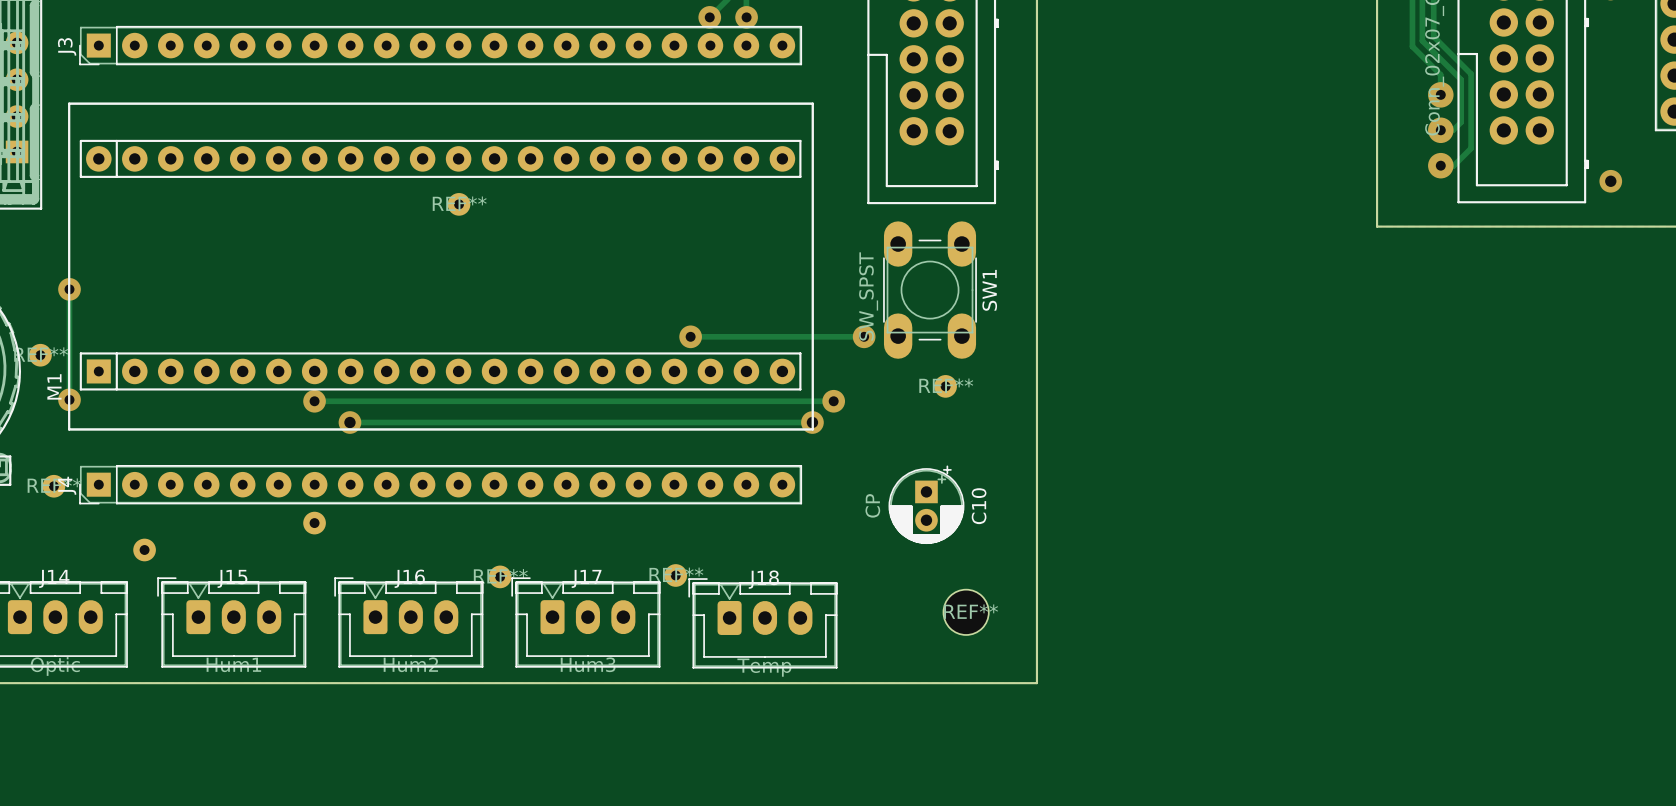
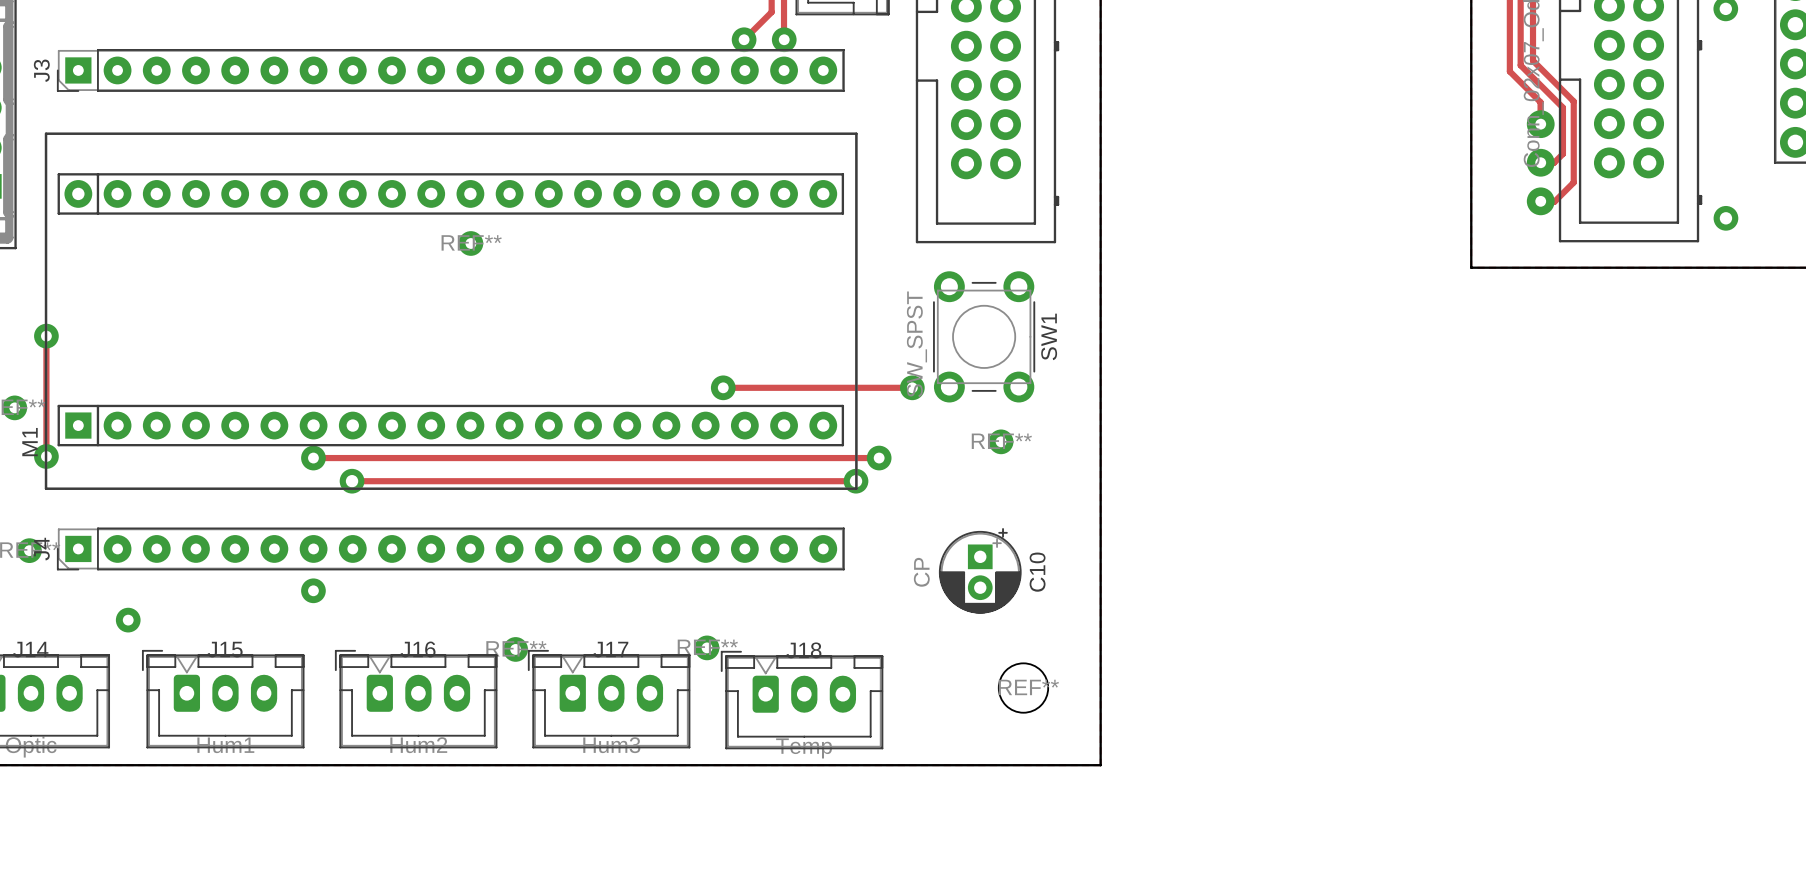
SW1 footprint: [883, 221, 977, 359] -> [933, 271, 1036, 403]

